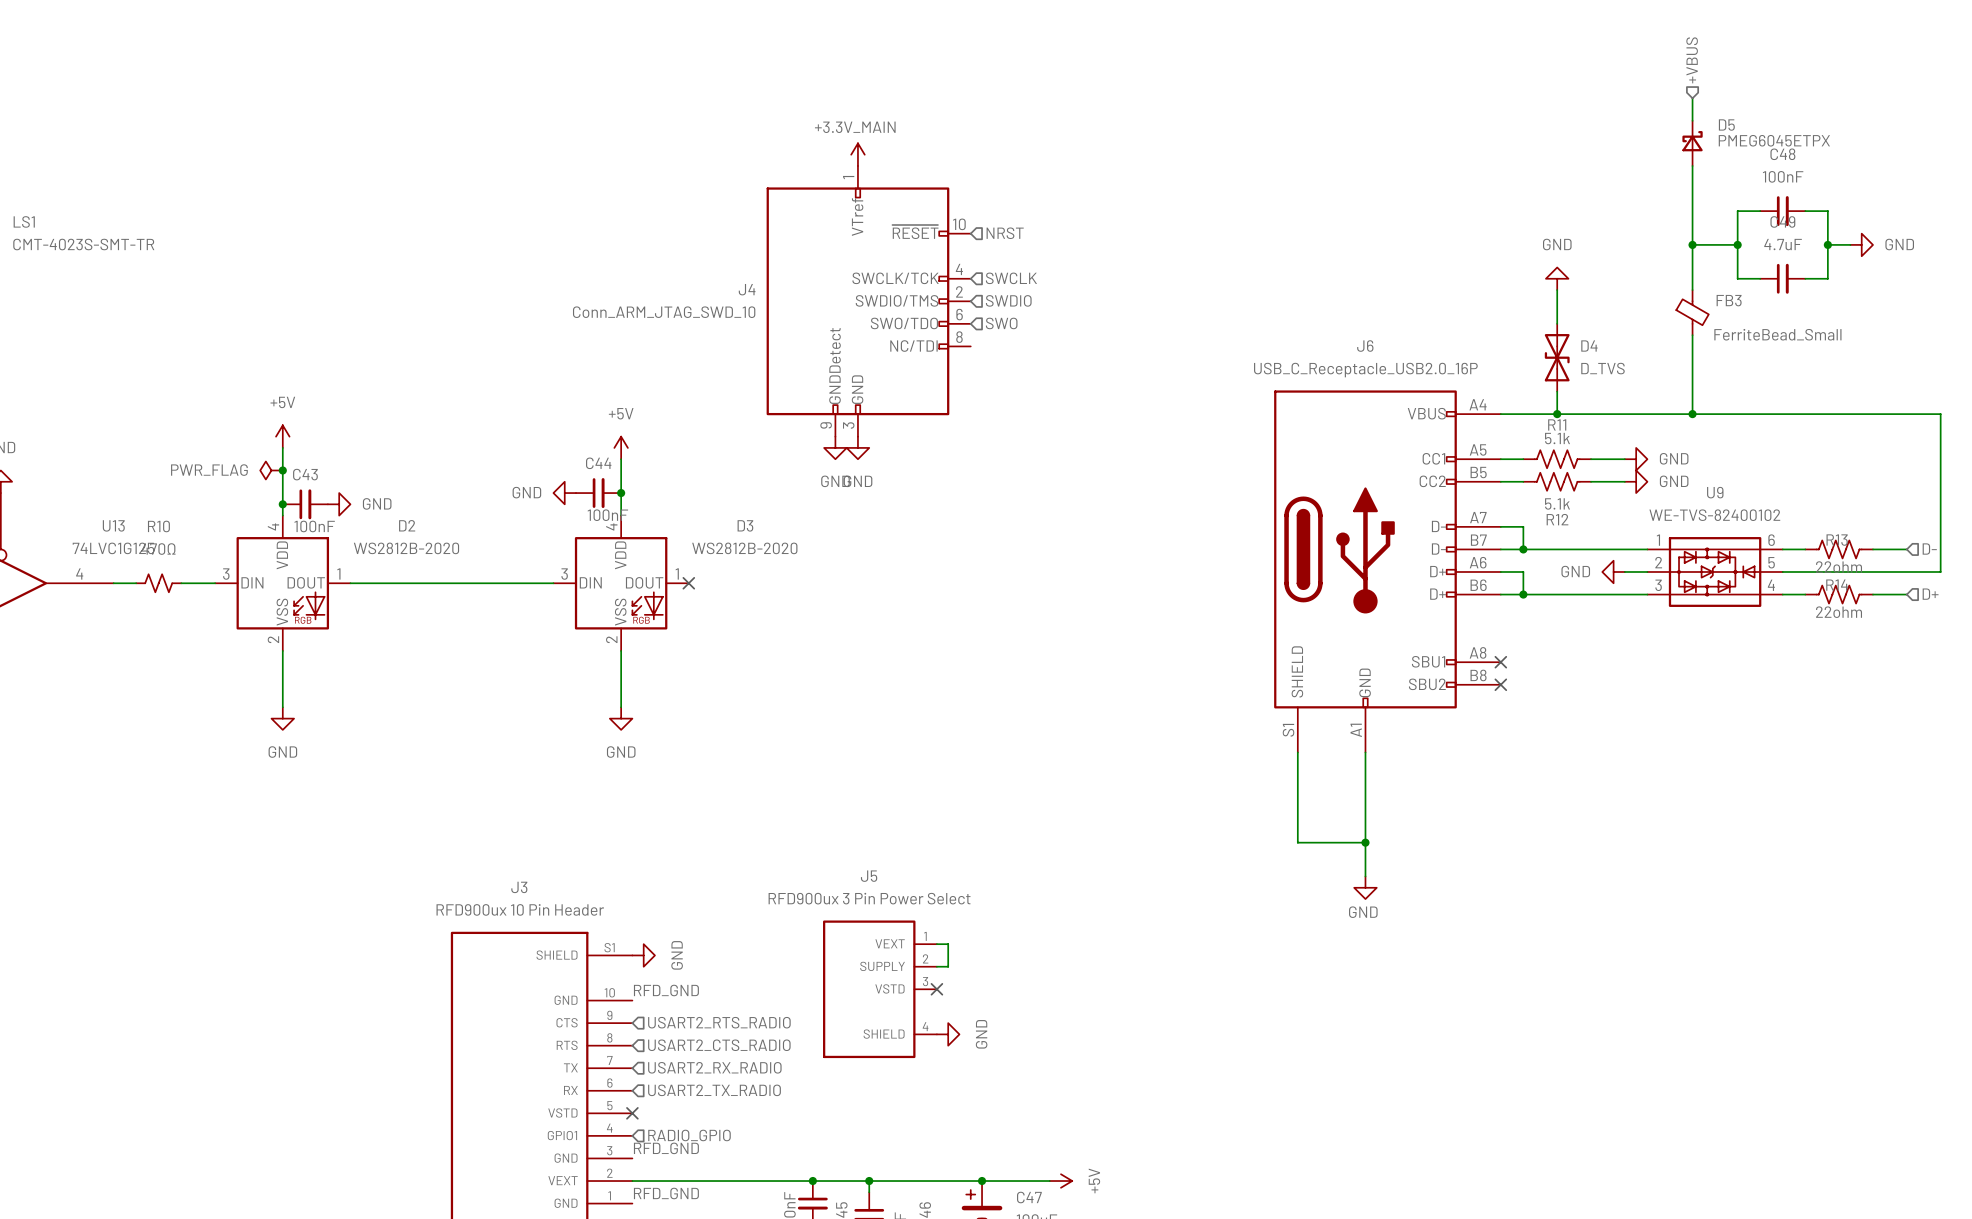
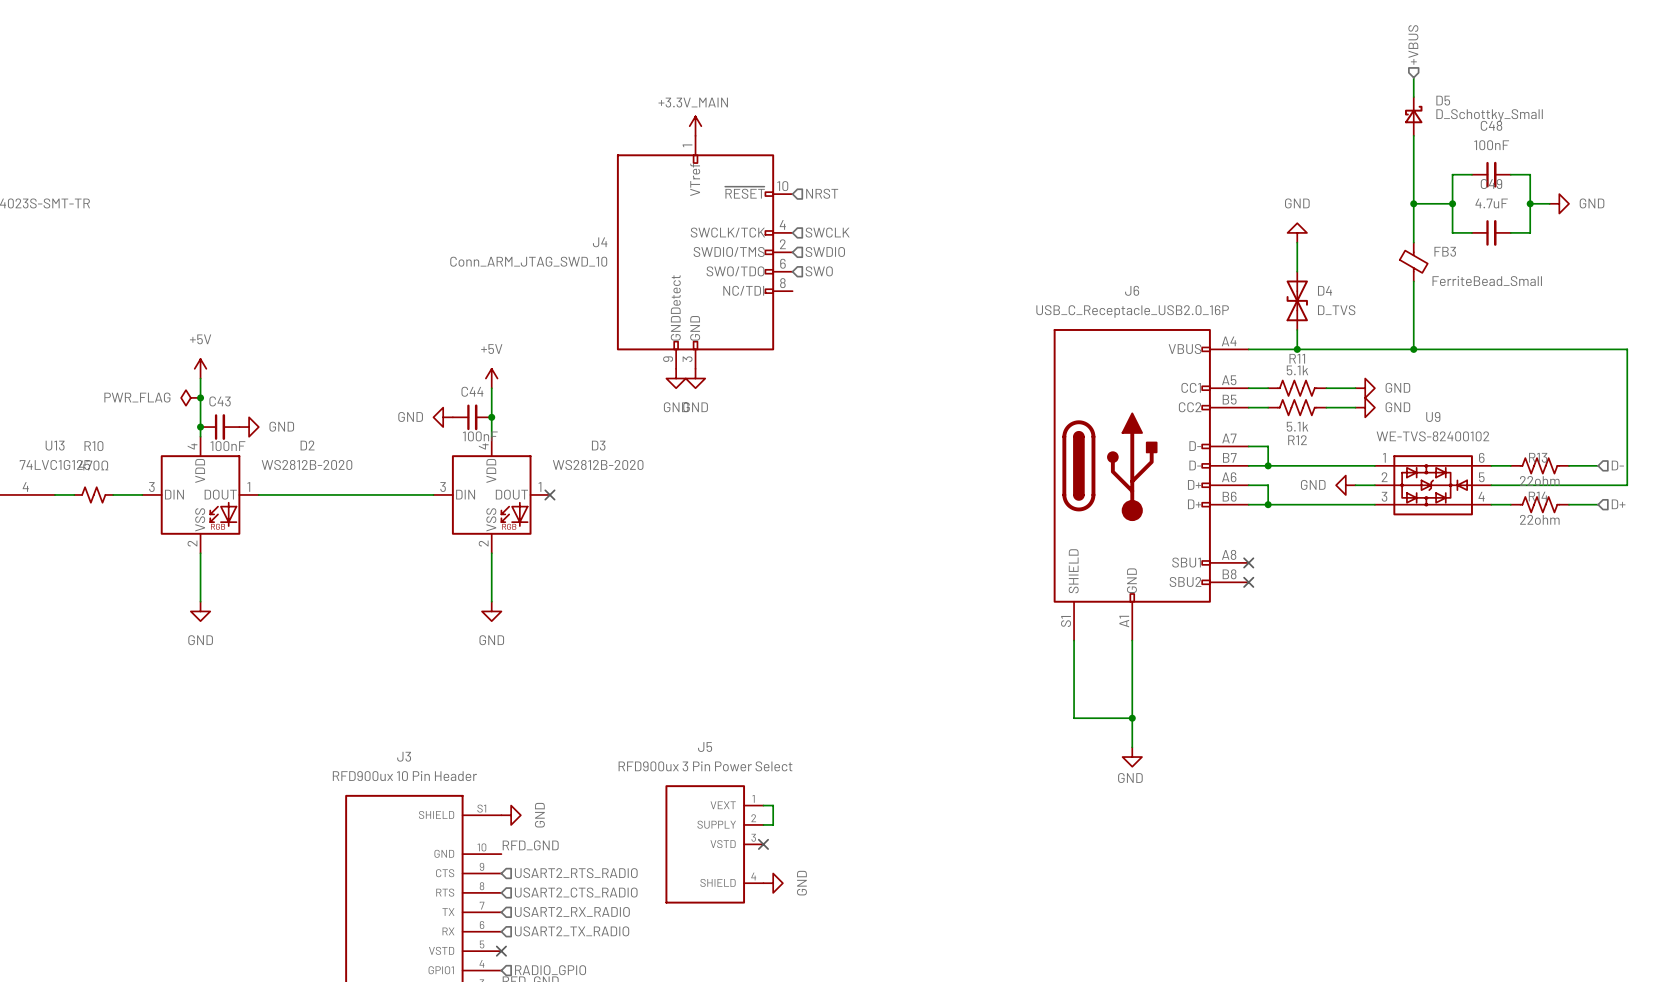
D5 value: PMEG6045ETPX (1774, 140) -> D_Schottky_Small (1489, 115)

